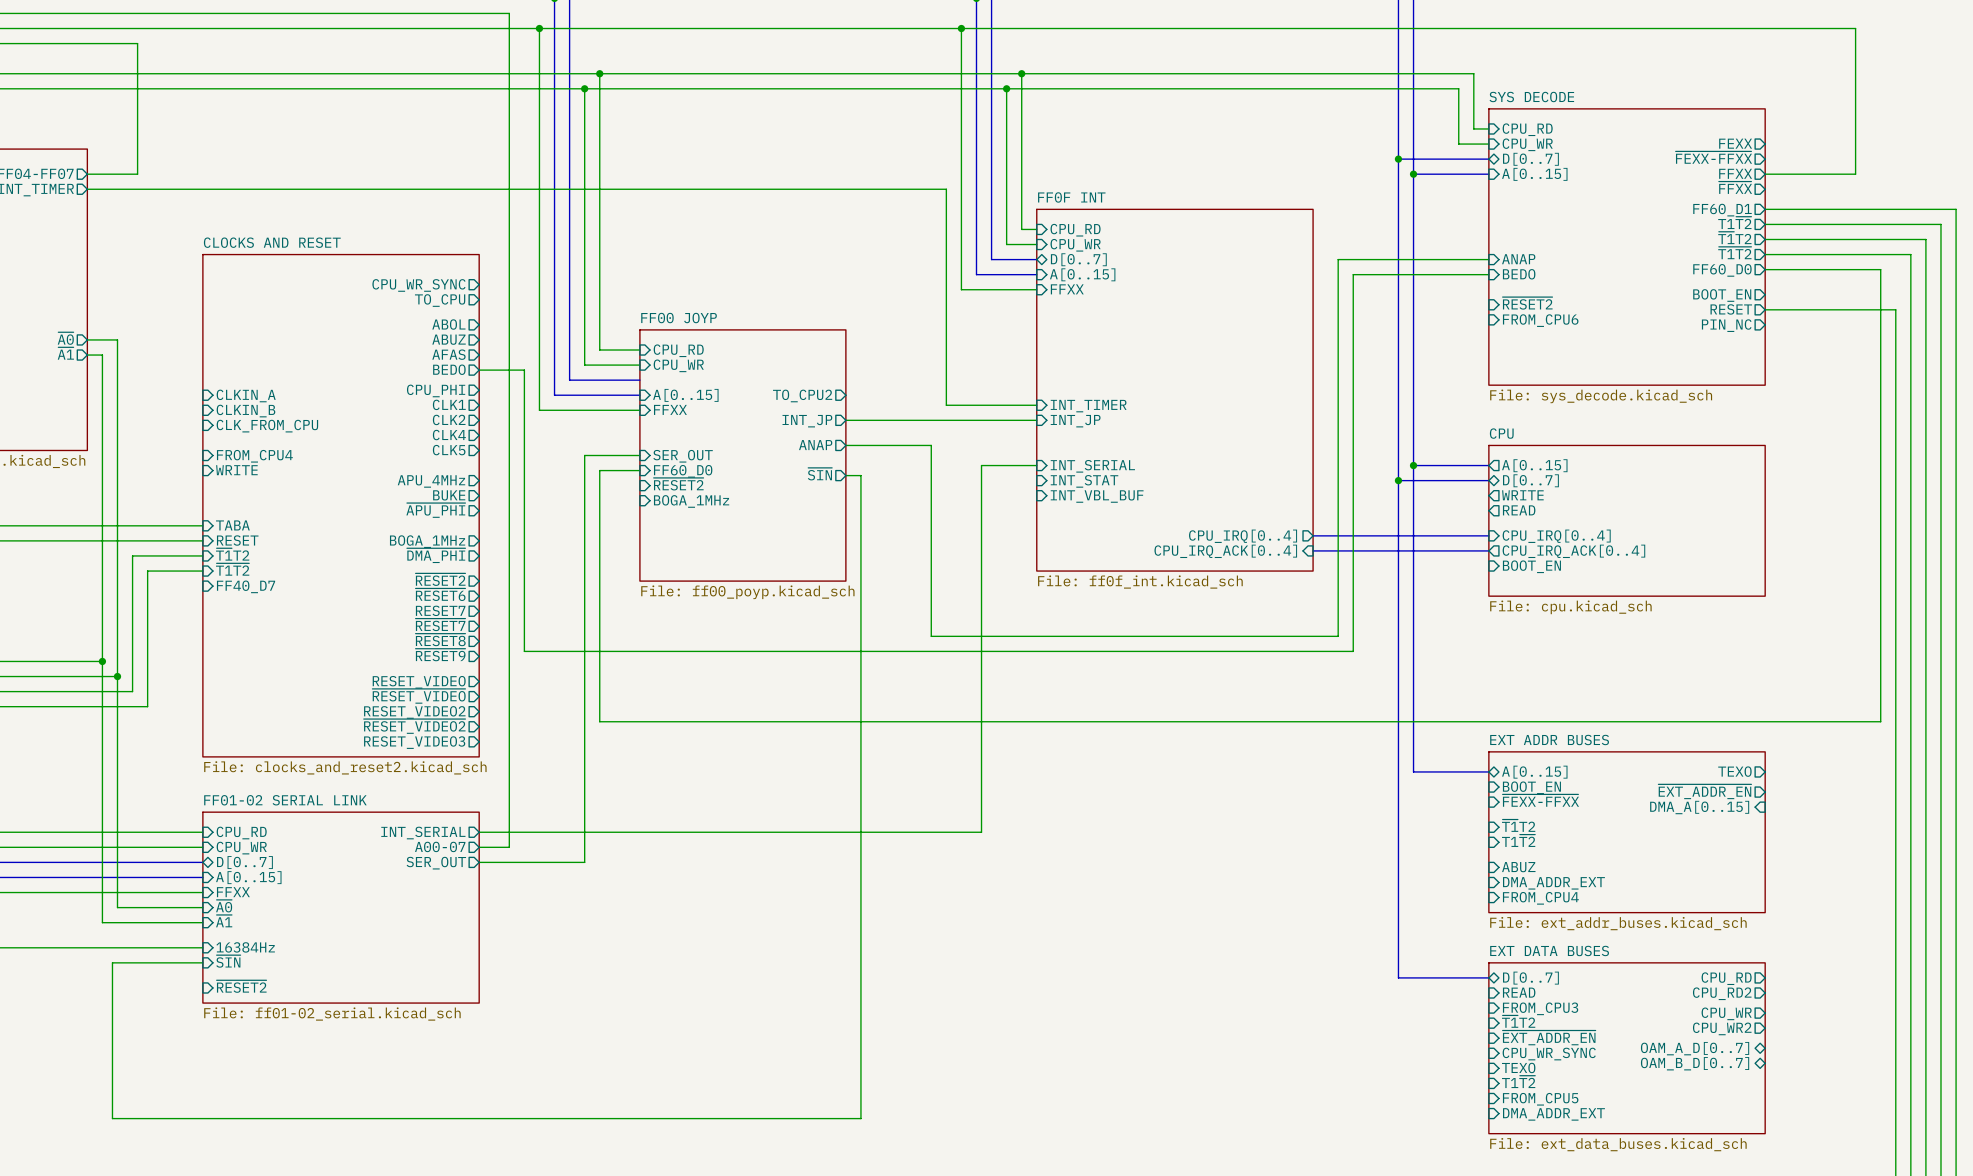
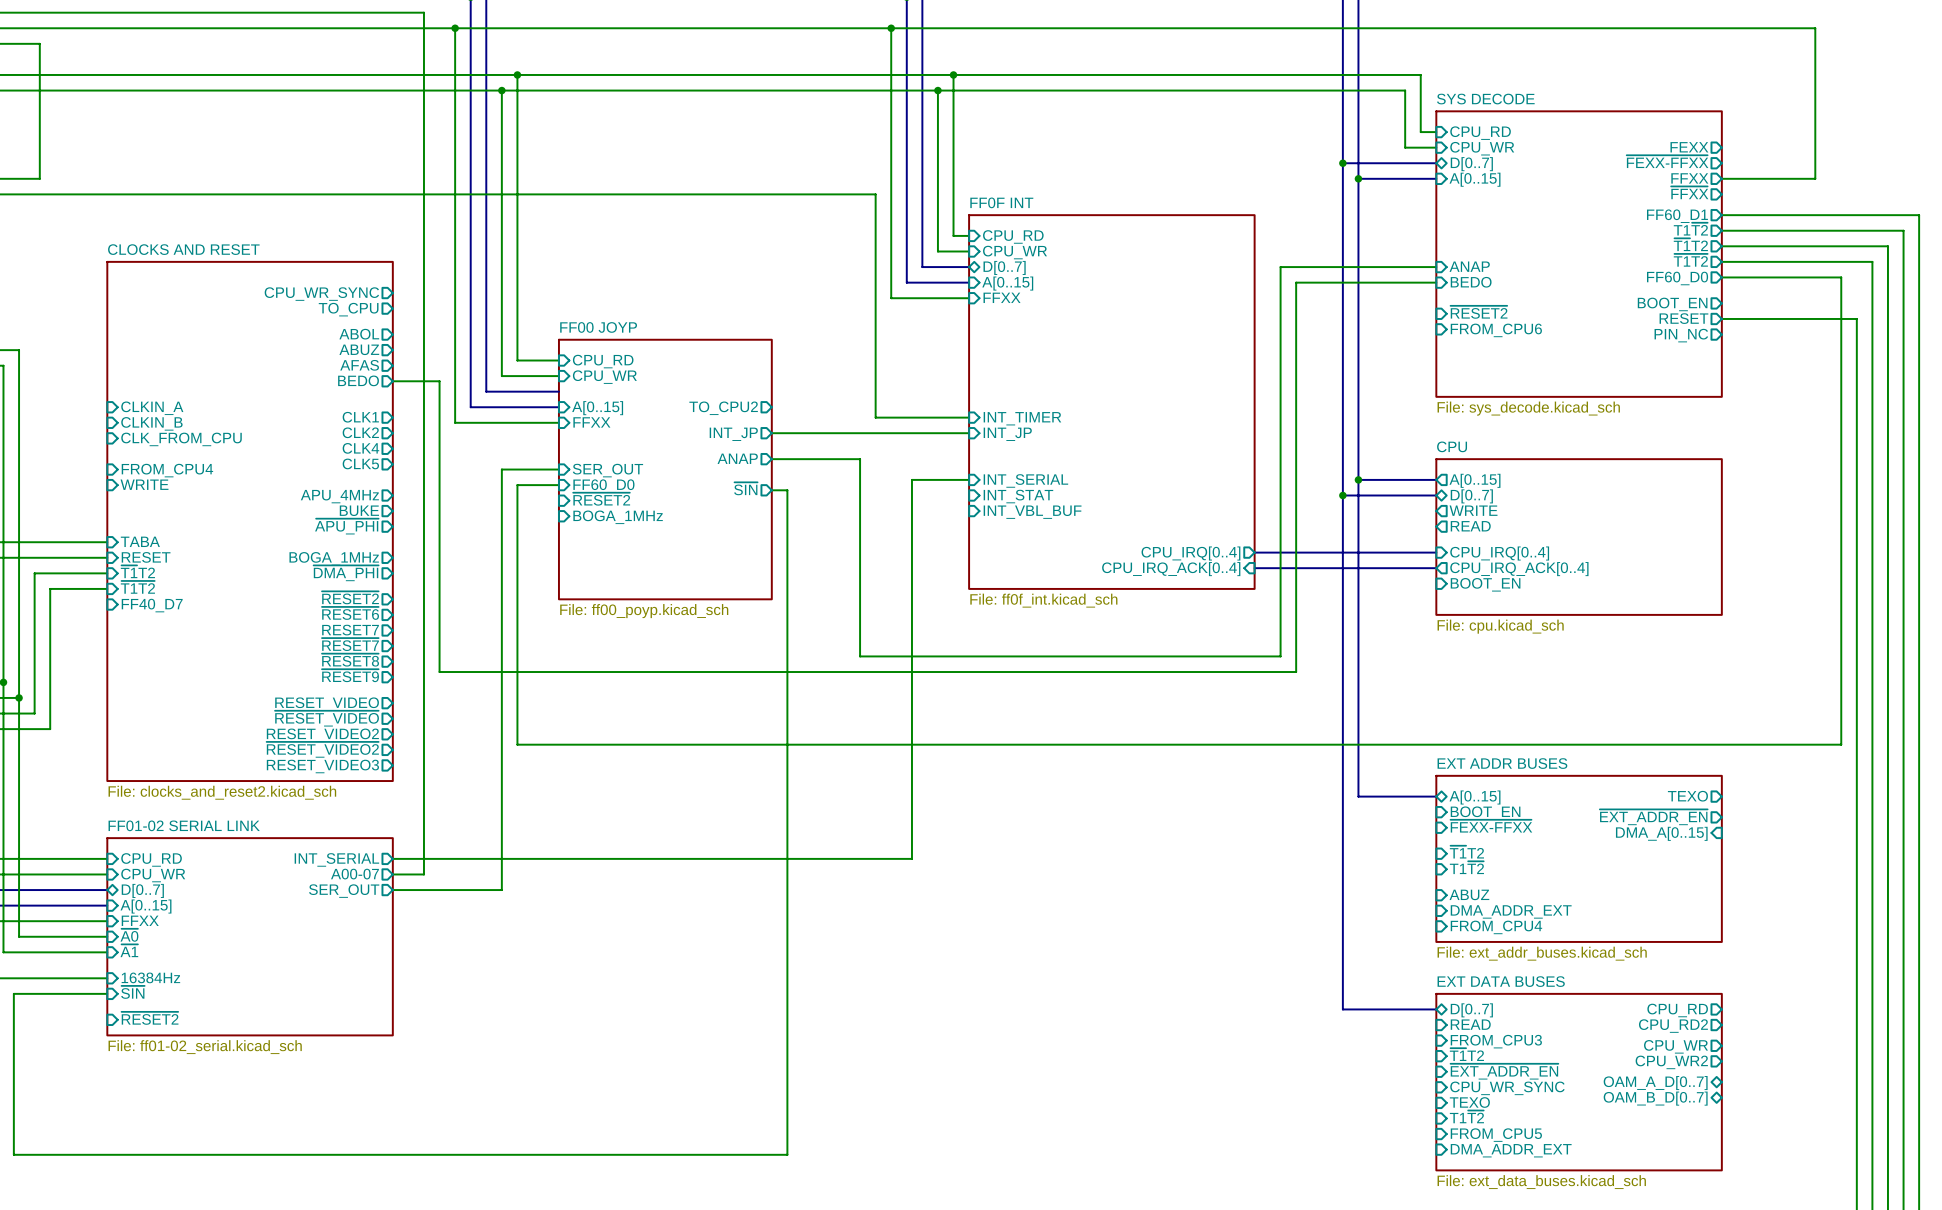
sheet pin: CPU_PHI (436, 390) -> none

